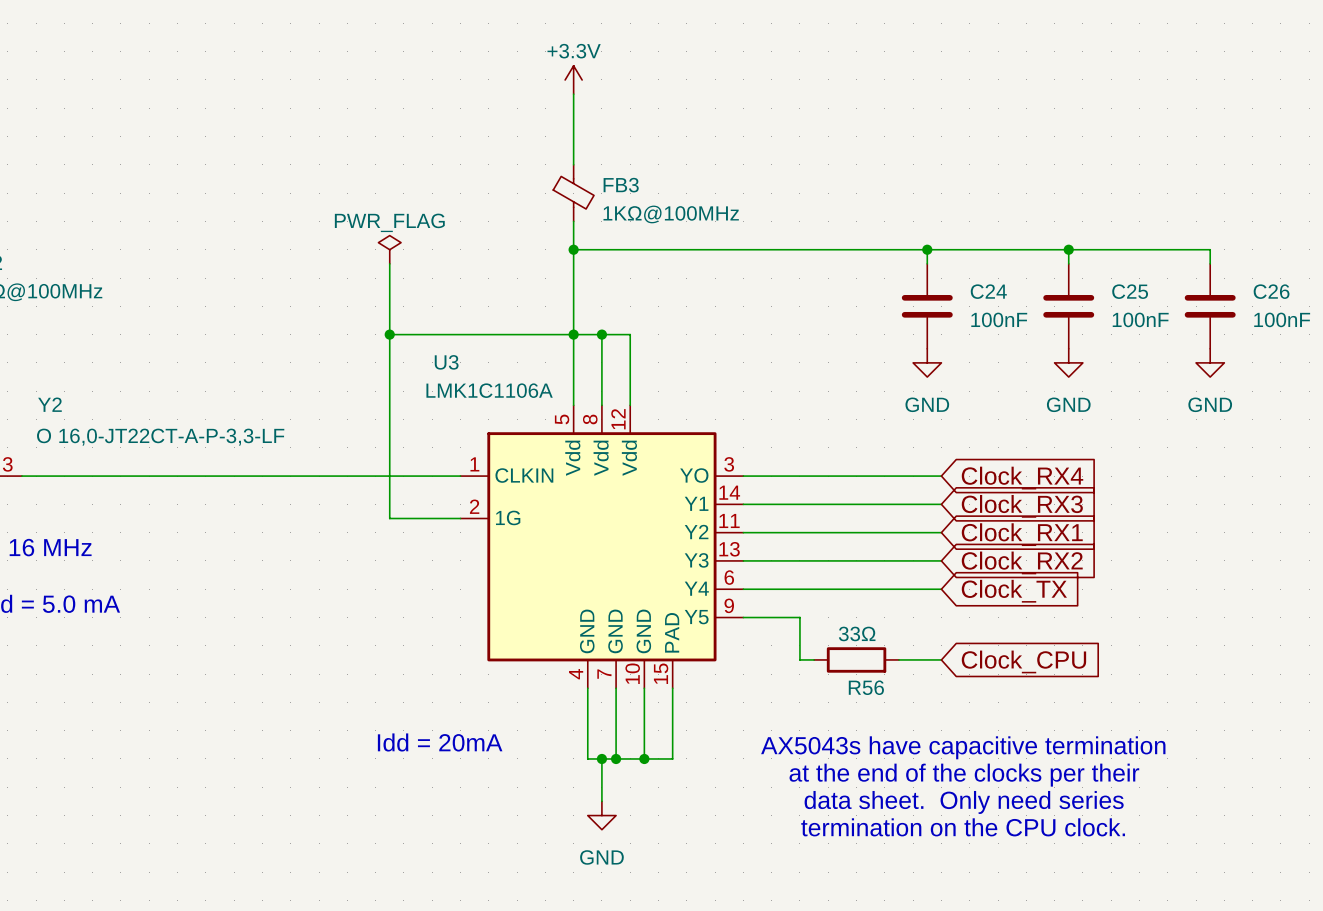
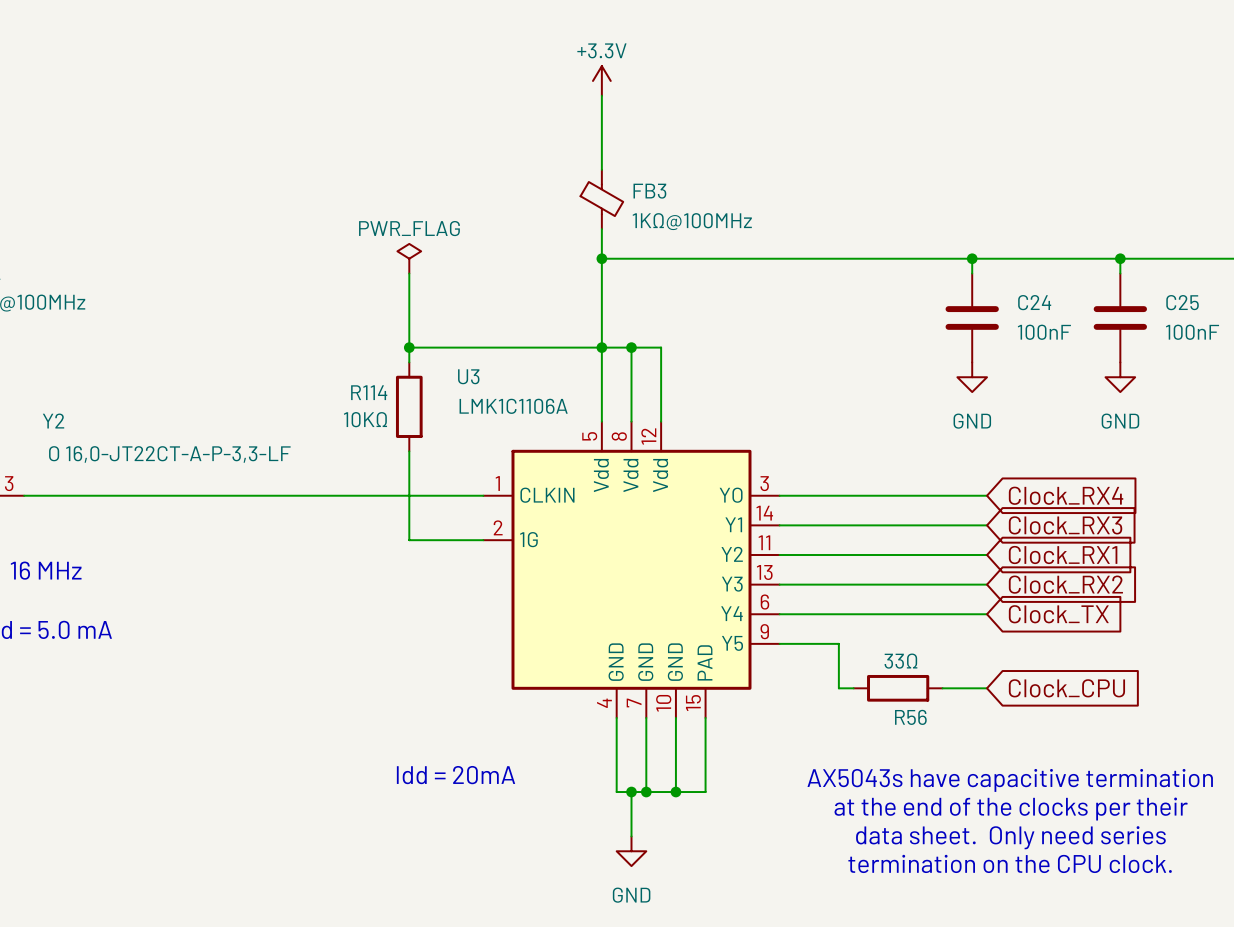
wire: (389, 348) (389, 433) -> none
R114: none -> 10KΩ (409, 406)

